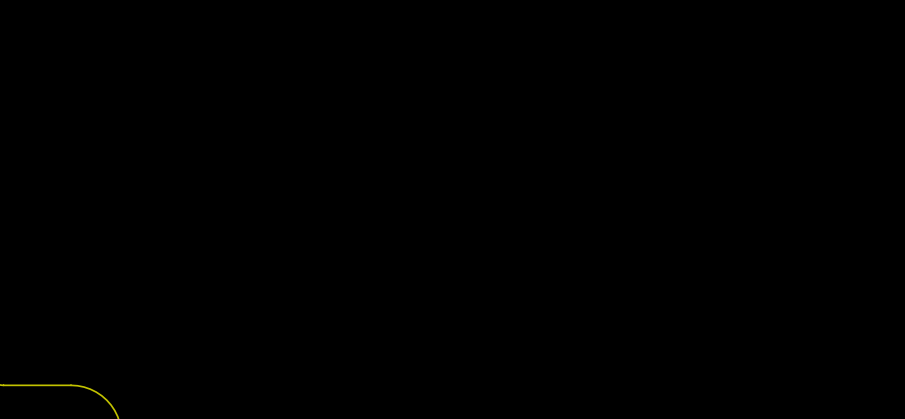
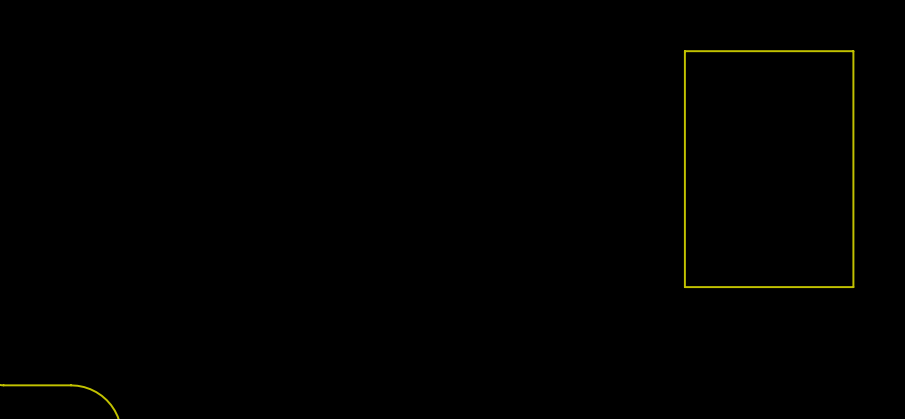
board edge: none -> (853, 51) (684, 51) (684, 287) (853, 287) (853, 51)

